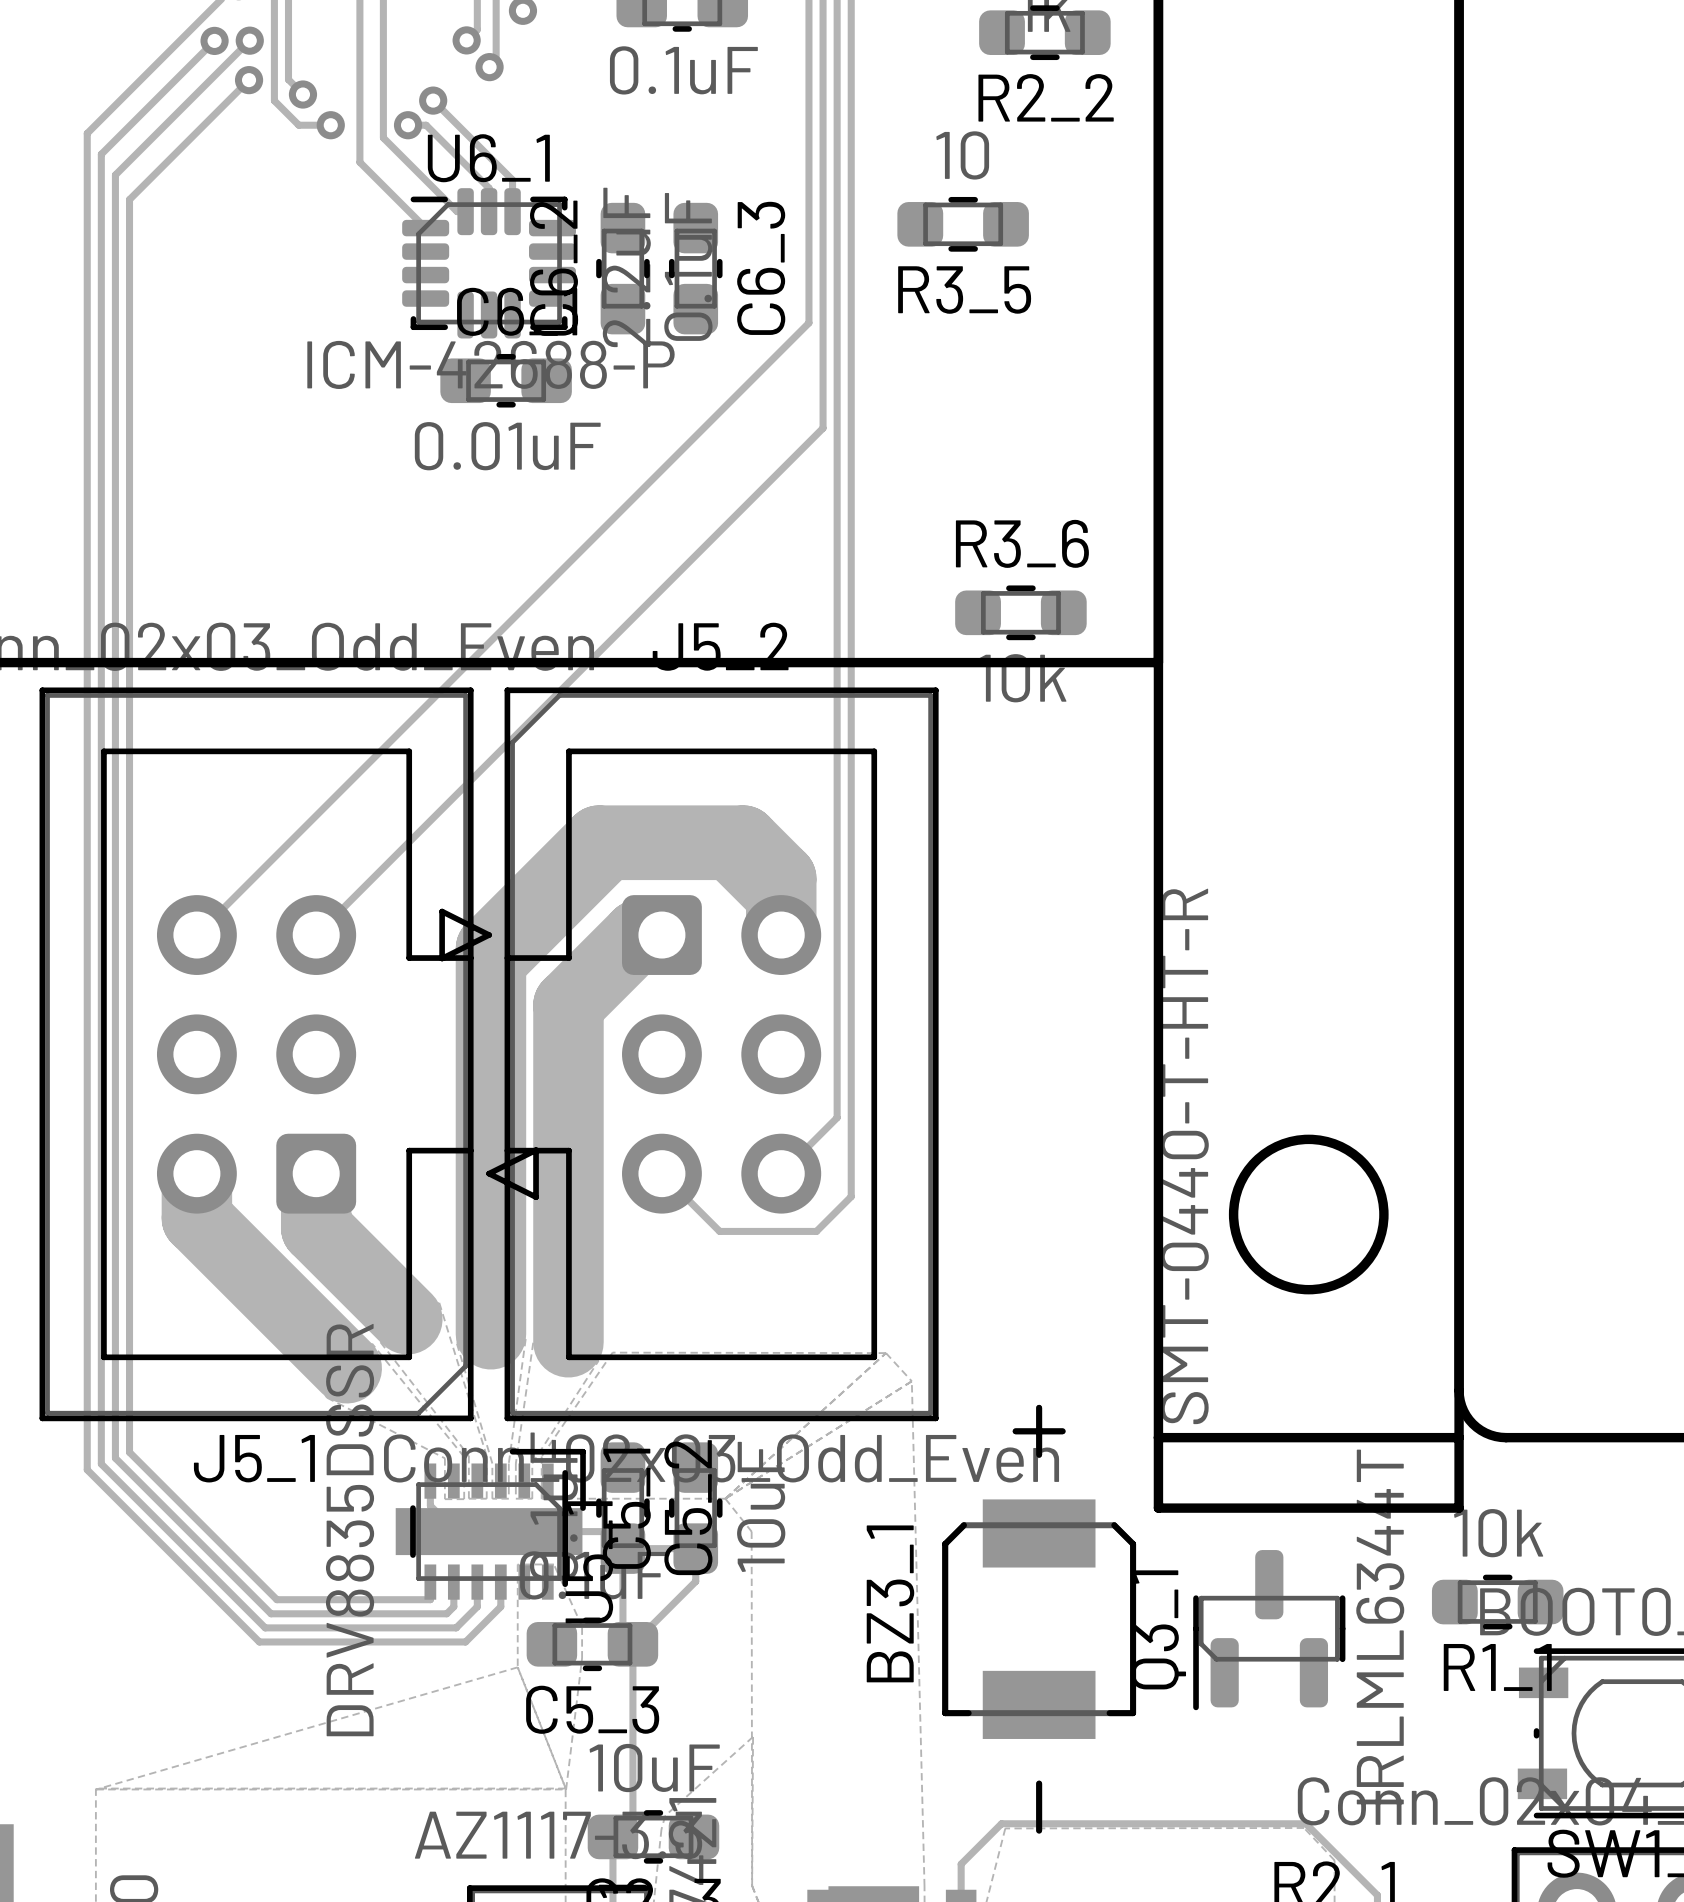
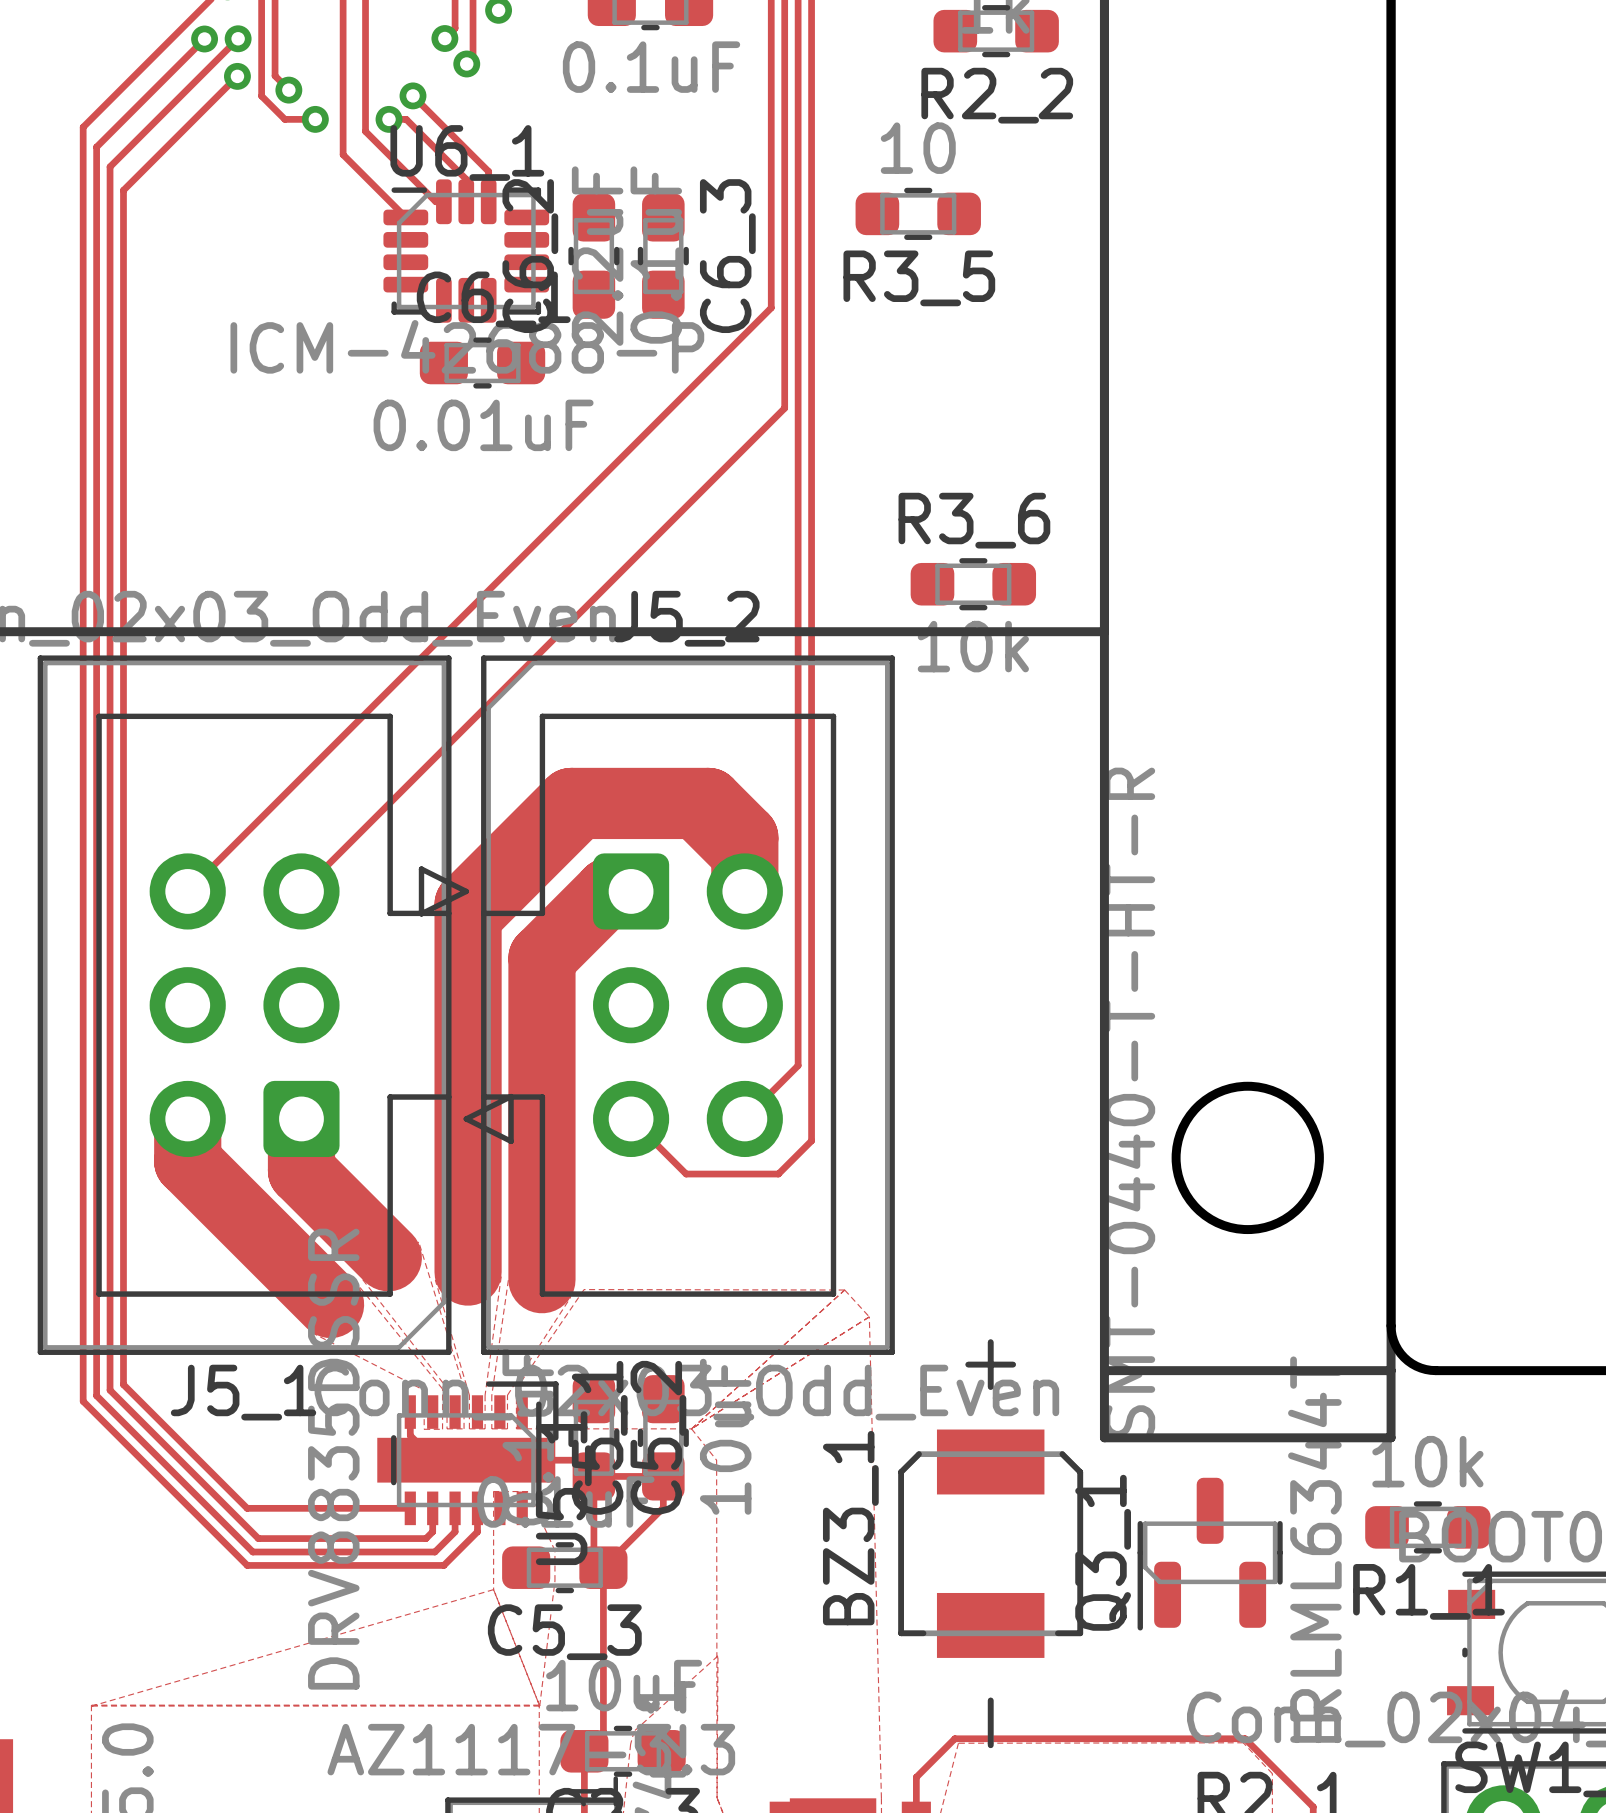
track: (259, 1582) (276, 1599) (430, 1599) (430, 1582) -> (247, 1508) (410, 1508)

